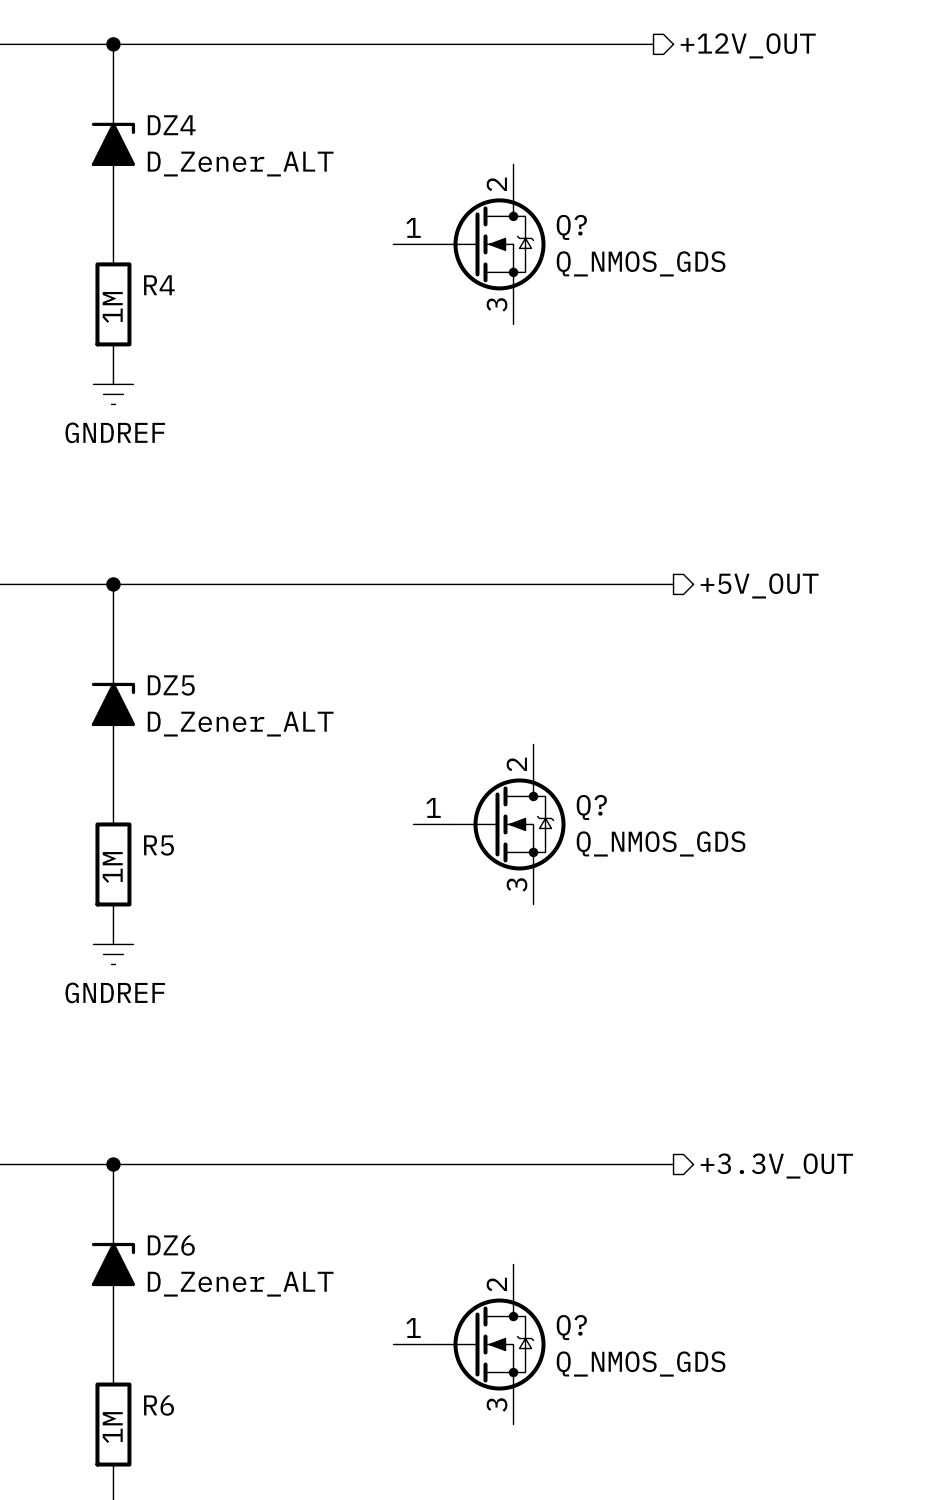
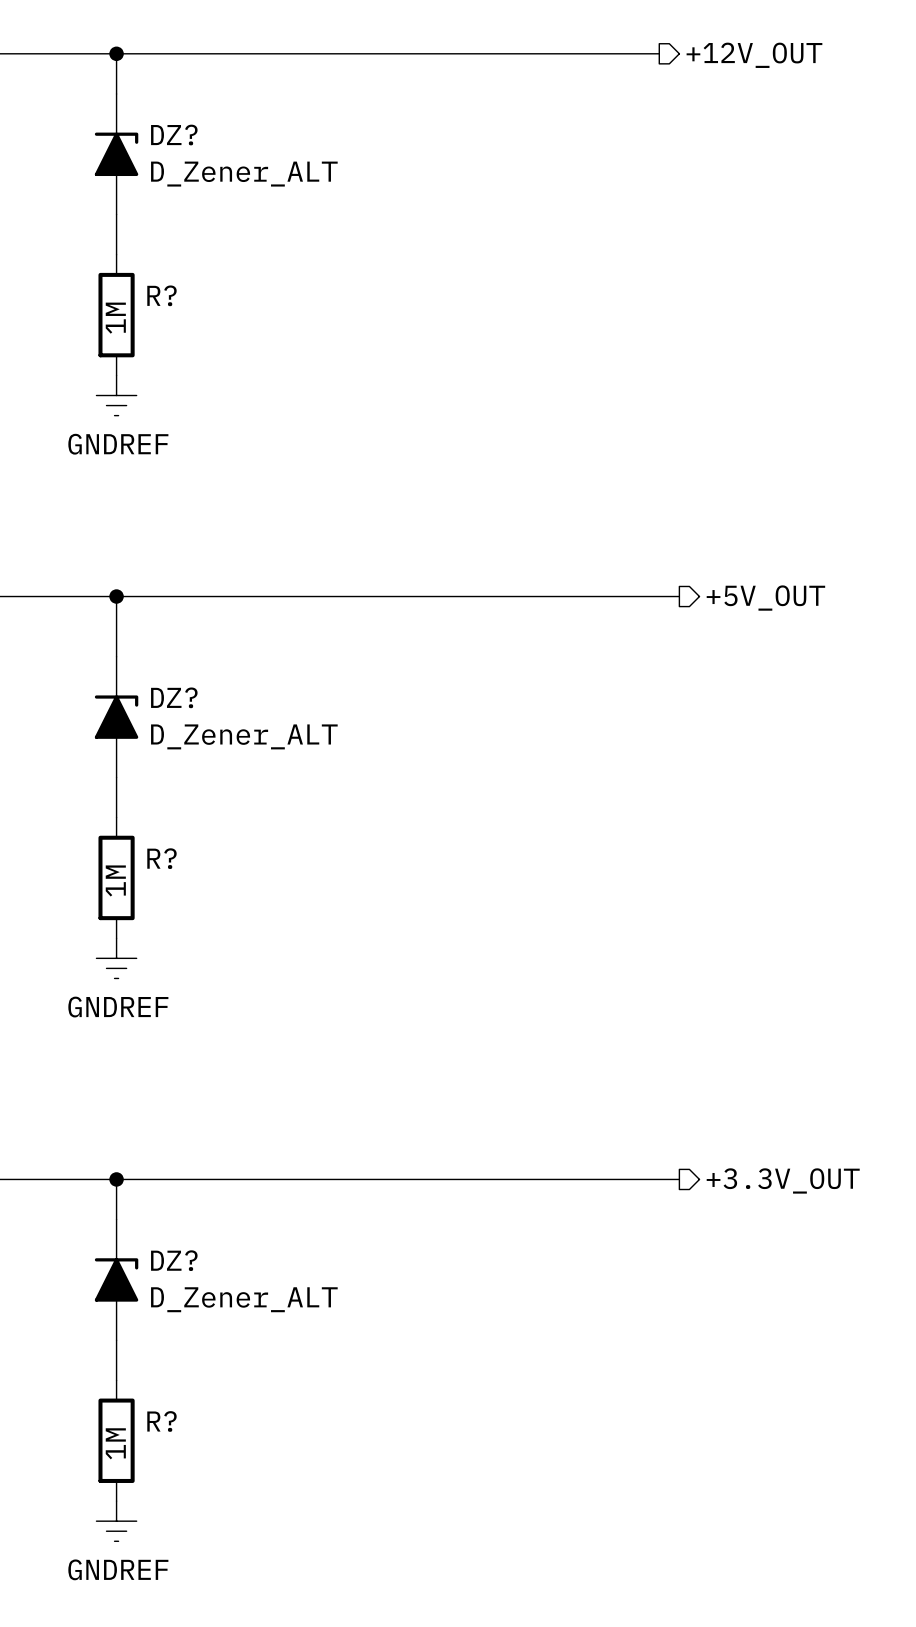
DZ4 name: DZ4 (171, 125) -> DZ? (174, 135)
Q?: Q_NMOS_GDS (469, 244) -> none
R4 name: R4 (159, 285) -> R? (161, 295)
DZ5 name: DZ5 (171, 685) -> DZ? (174, 697)
Q?: Q_NMOS_GDS (489, 824) -> none
R5 name: R5 (158, 845) -> R? (161, 858)
DZ6 name: DZ6 (171, 1245) -> DZ? (174, 1260)
Q?: Q_NMOS_GDS (469, 1344) -> none
R6 name: R6 (159, 1405) -> R? (161, 1421)

